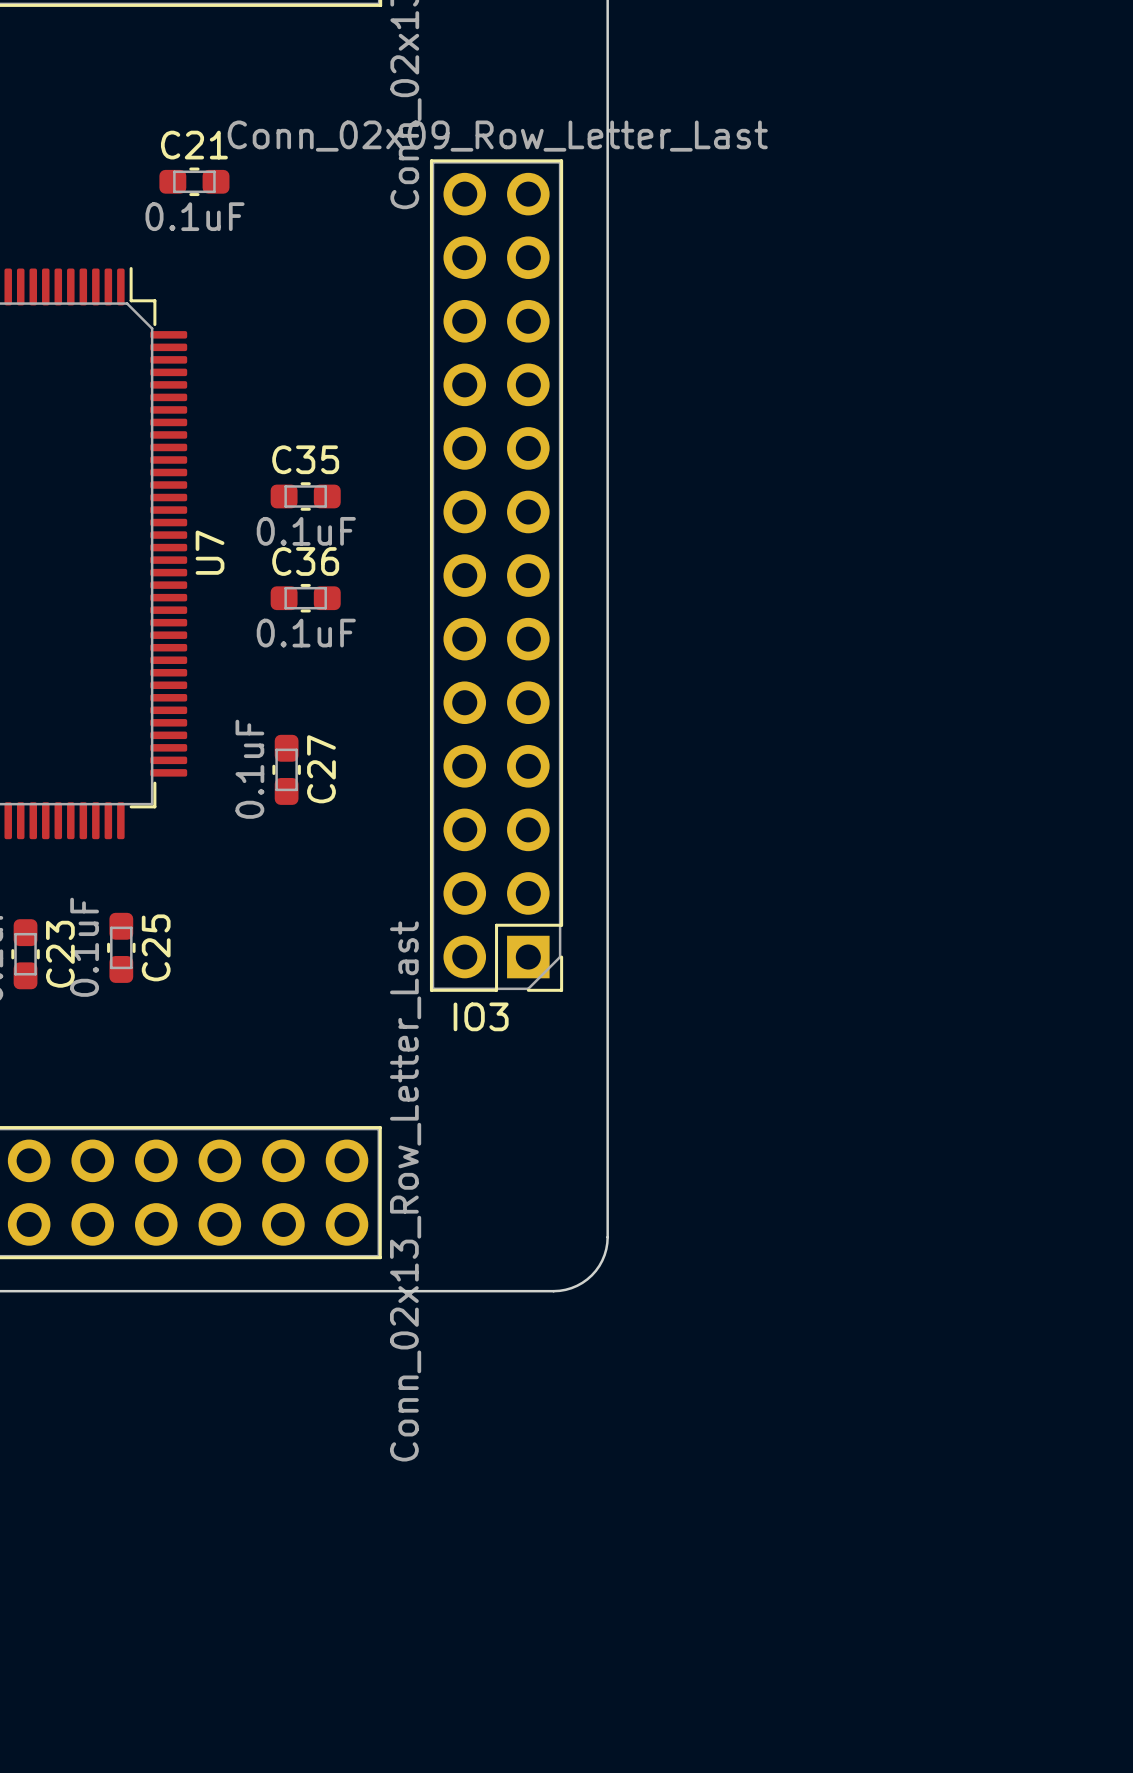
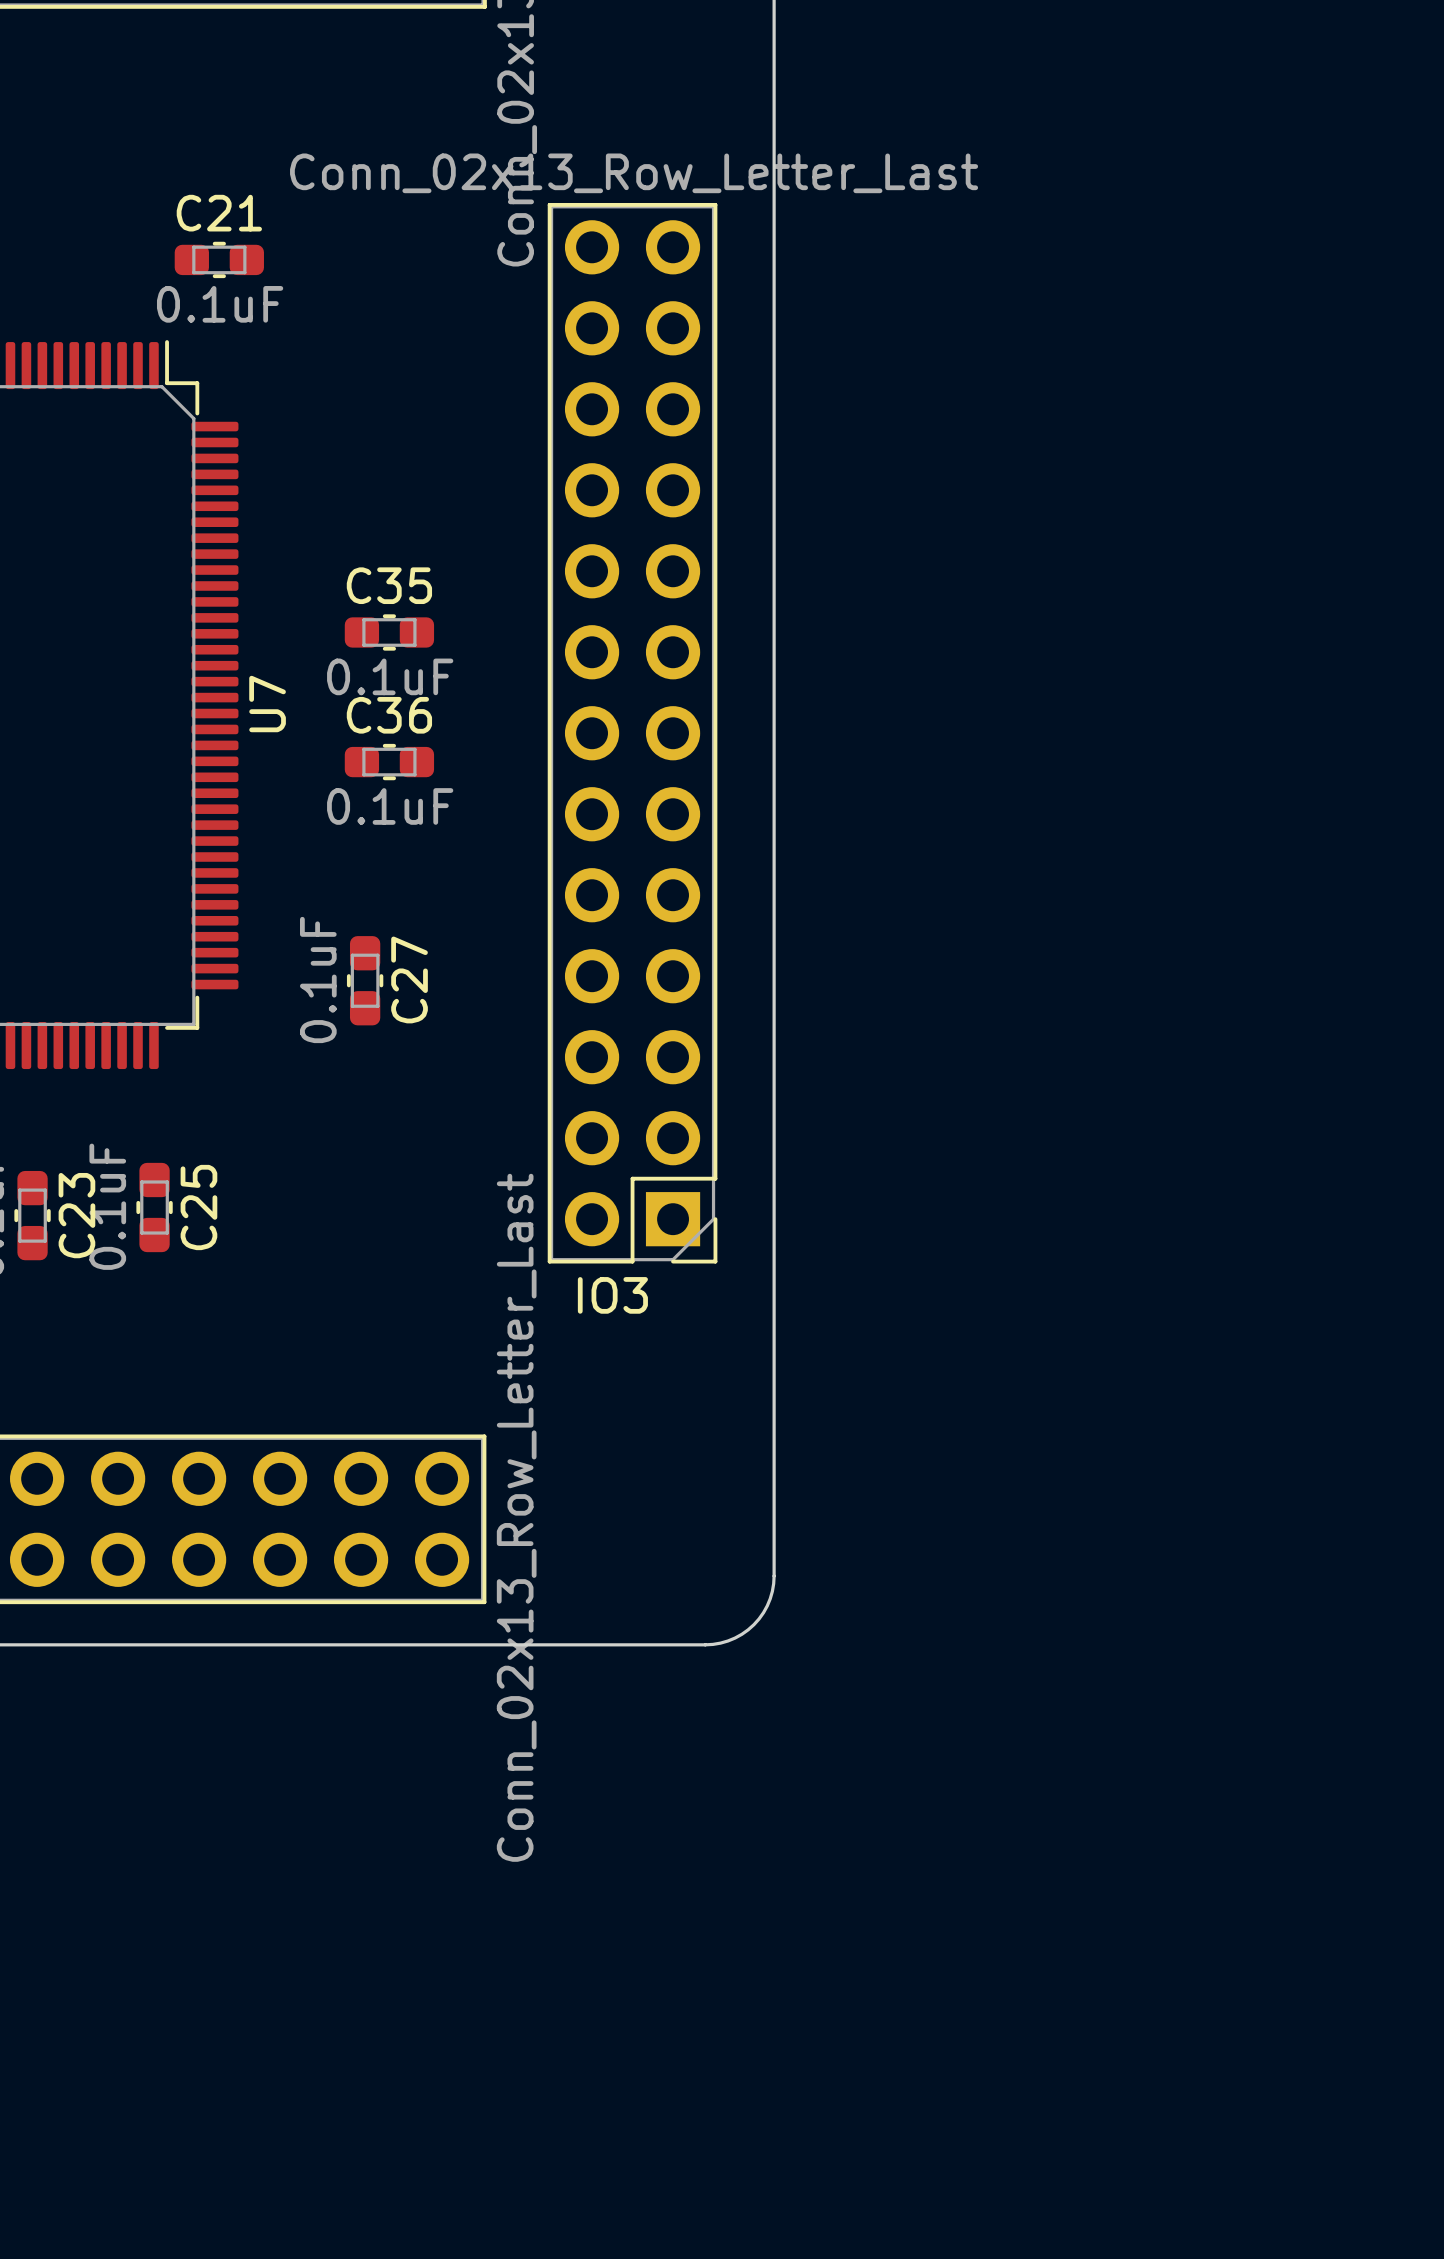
IO3 value: Conn_02x09_Row_Letter_Last (497, 136) -> Conn_02x13_Row_Letter_Last (634, 173)
C21 position: (194, 181) -> (219, 259)

